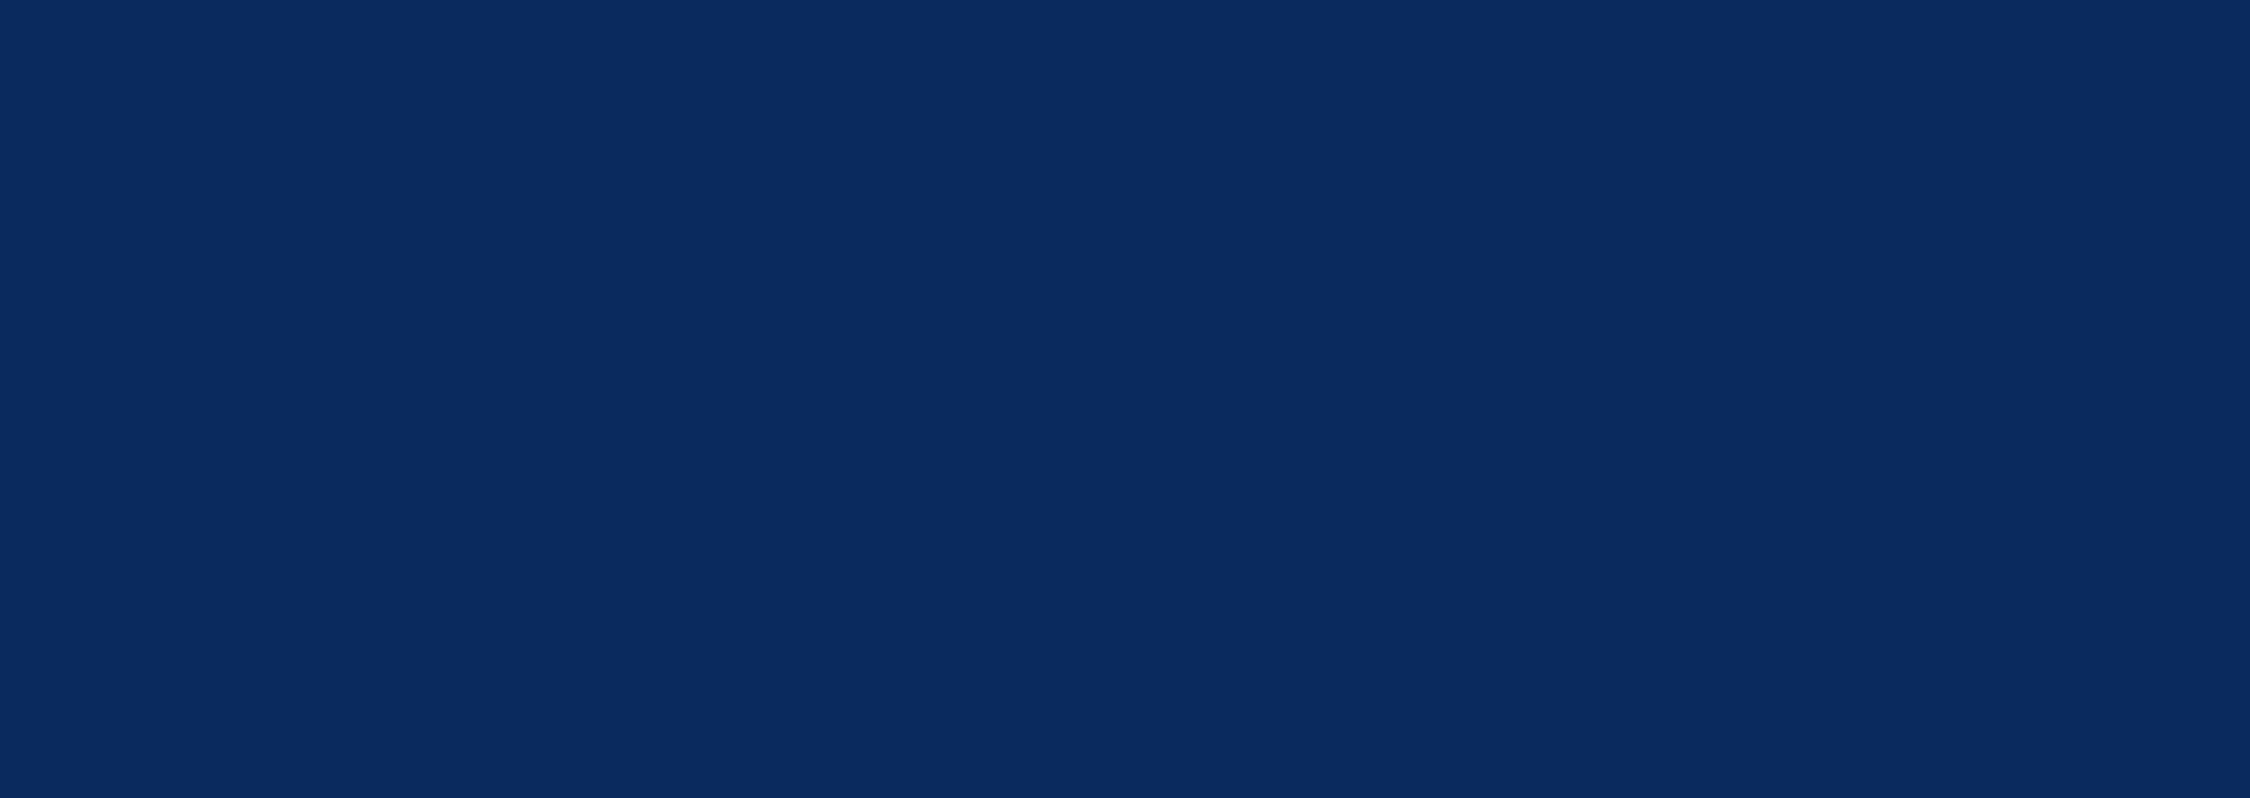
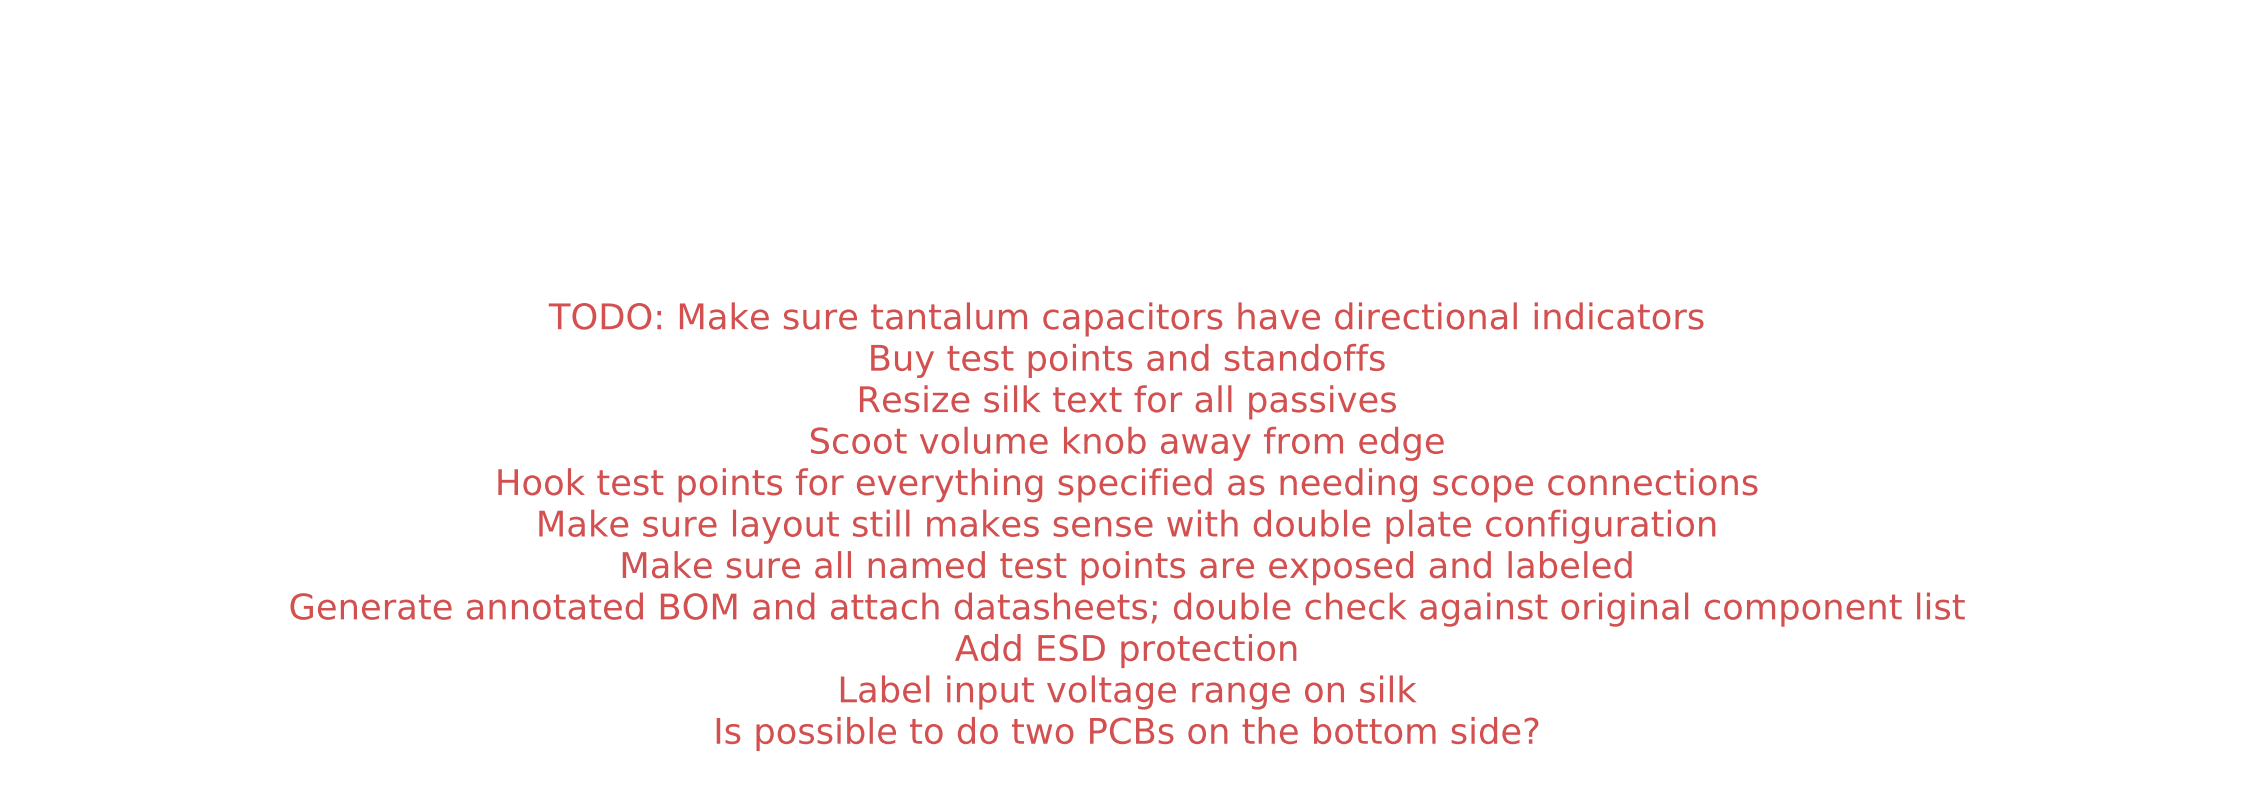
text: none -> TODO: Make sure tantalum capacitors have directional indicators (1126, 319)
text: none -> Buy test points and standoffs (1127, 360)
text: none -> Resize silk text for all passives (1127, 402)
text: none -> Scoot volume knob away from edge (1127, 443)
text: none -> Hook test points for everything specified as needing scope connections (1127, 485)
text: none -> Make sure layout still makes sense with double plate configuration (1127, 526)
text: none -> Make sure all named test points are exposed and labeled (1127, 568)
text: none -> Generate annotated BOM and attach datasheets; double check against original component list (1127, 609)
text: none -> Add ESD protection (1125, 651)
text: none -> Label input voltage range on silk (1128, 692)
text: none -> Is possible to do two PCBs on the bottom side? (1127, 733)

